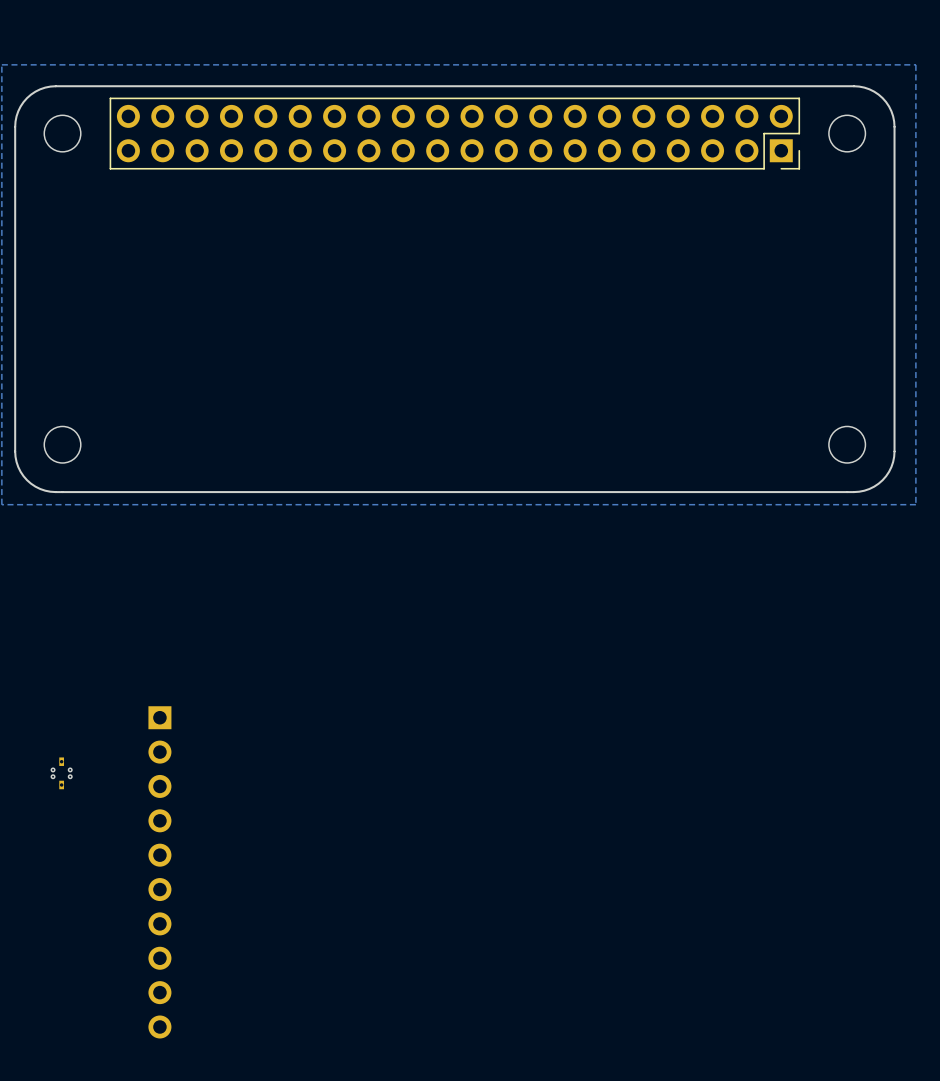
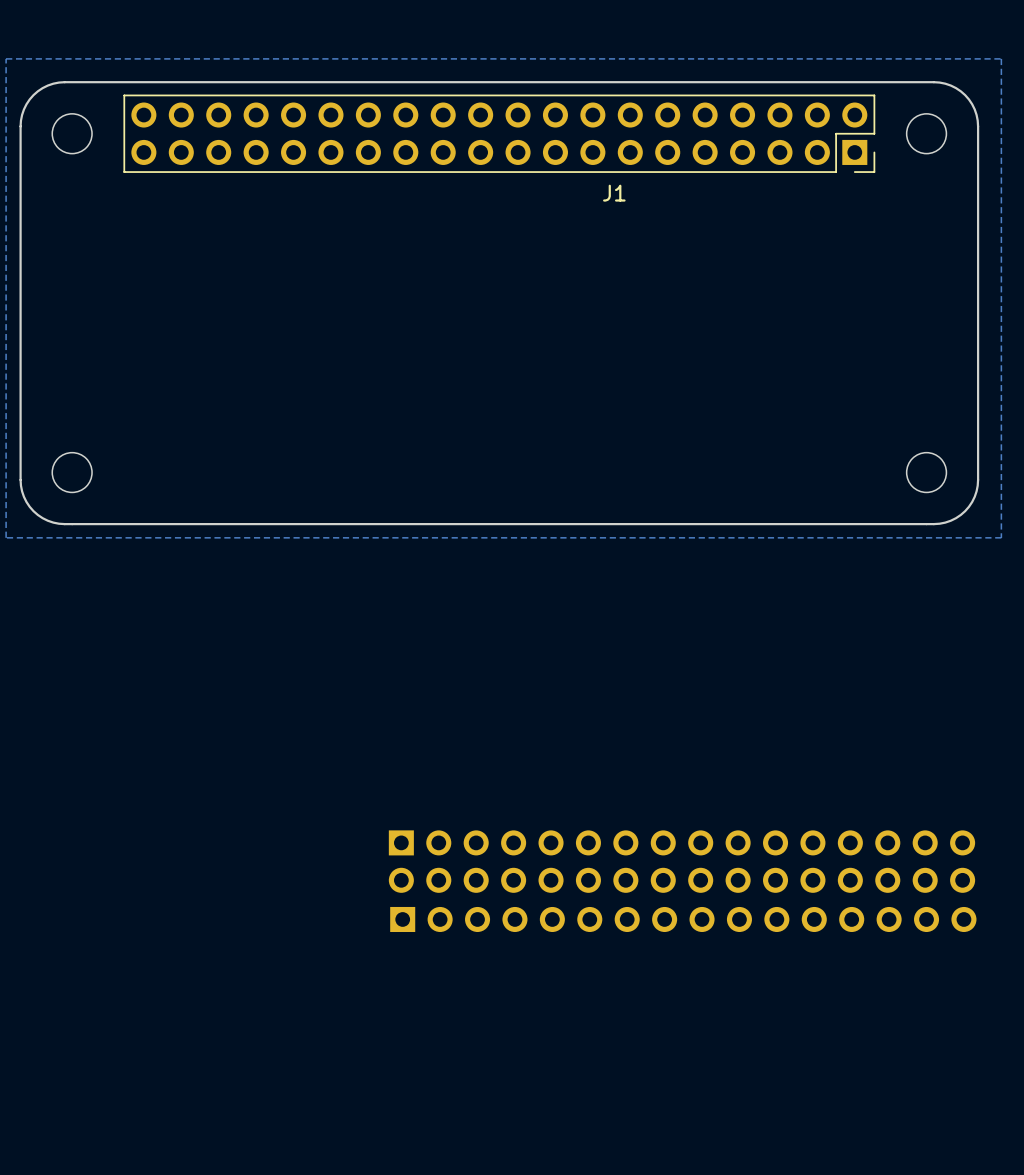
J1 name: none -> J1 (614, 193)
part: (61, 773) -> none
part: none -> (681, 861)
part: none -> (683, 919)
part: (159, 872) -> none

